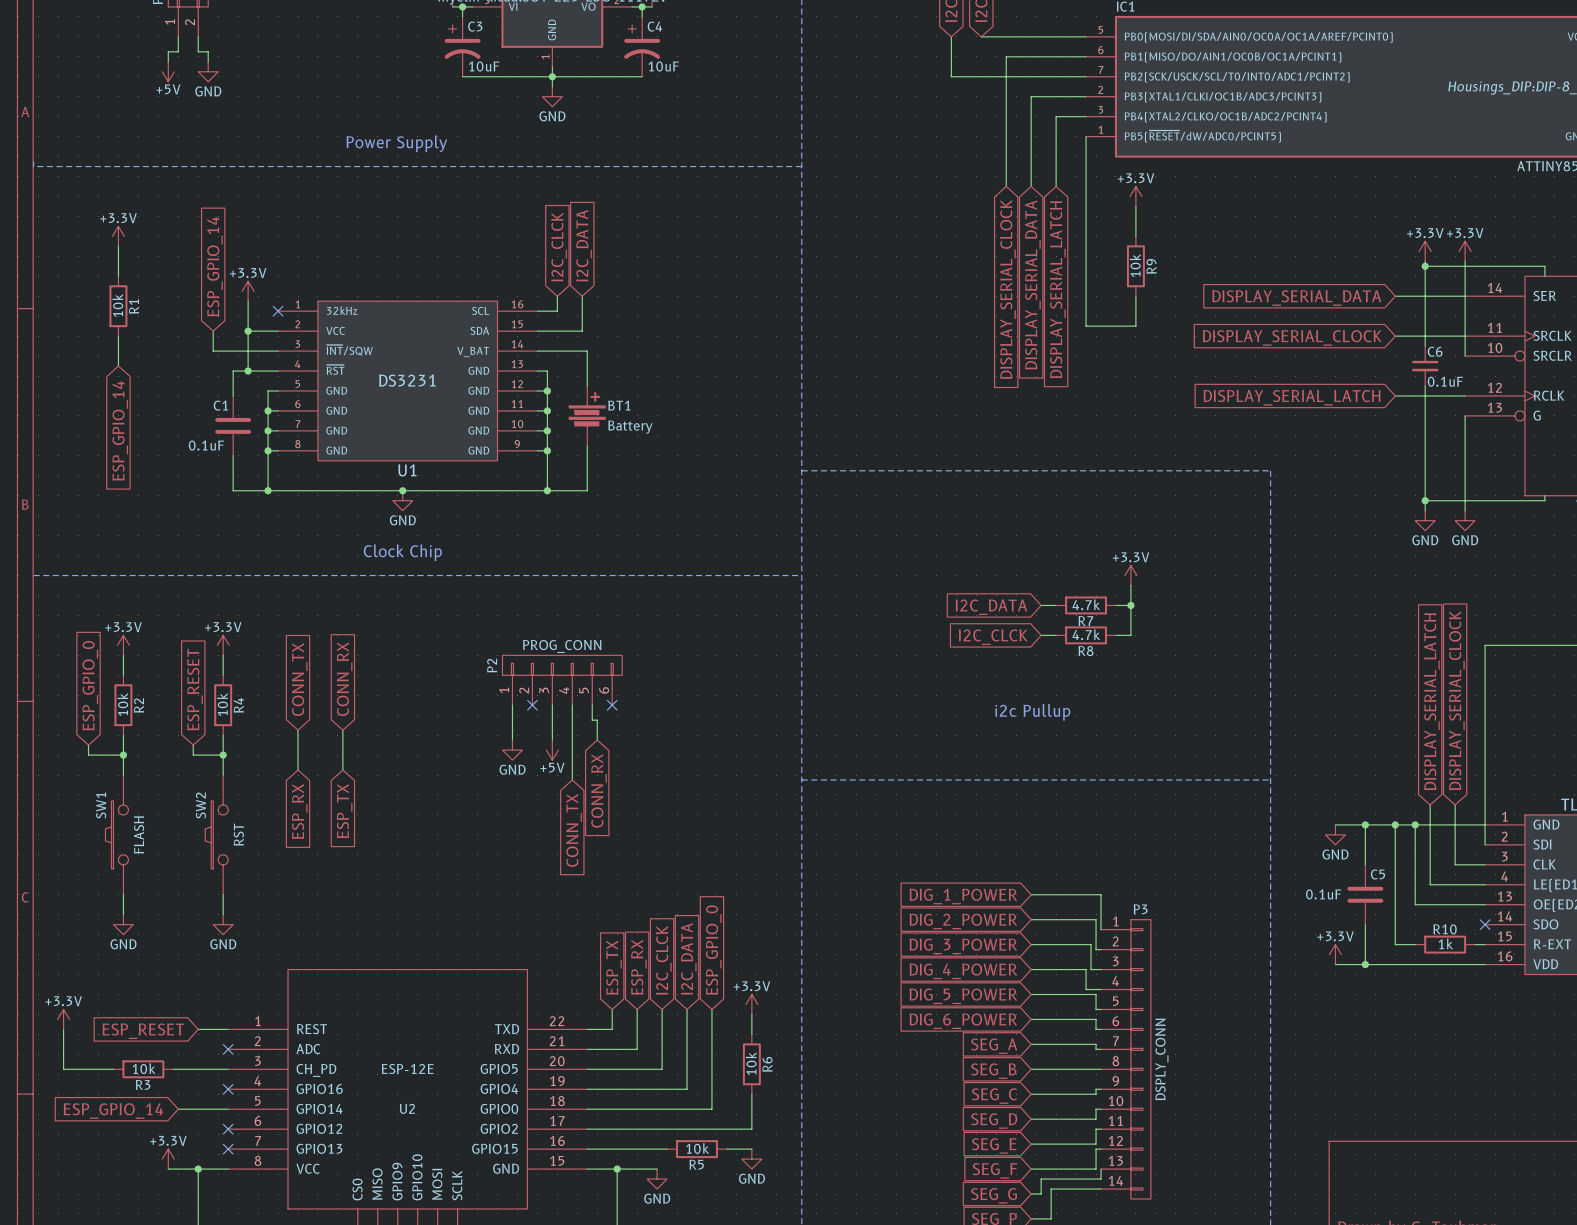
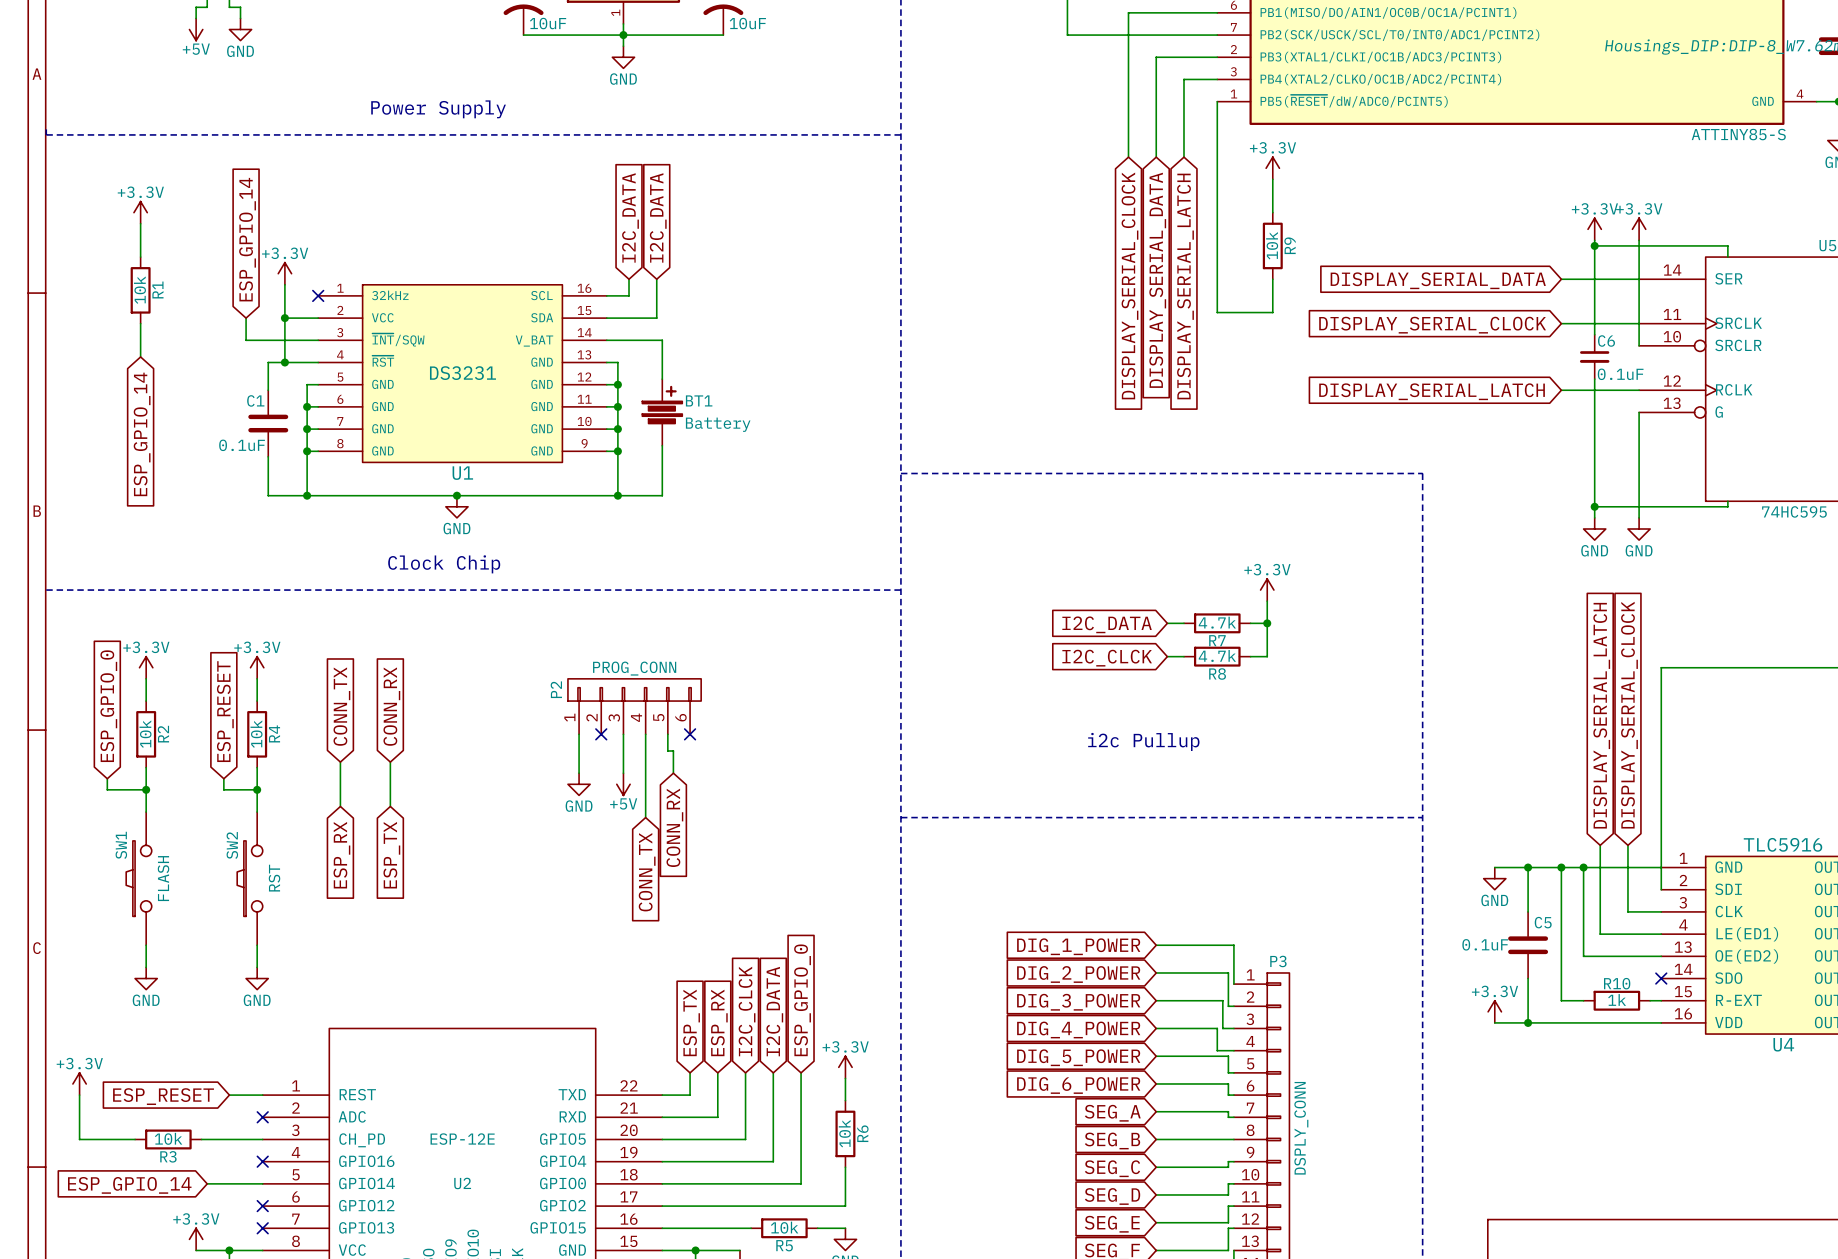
global label: I2C_CLCK (559, 247) -> I2C_DATA (630, 217)

